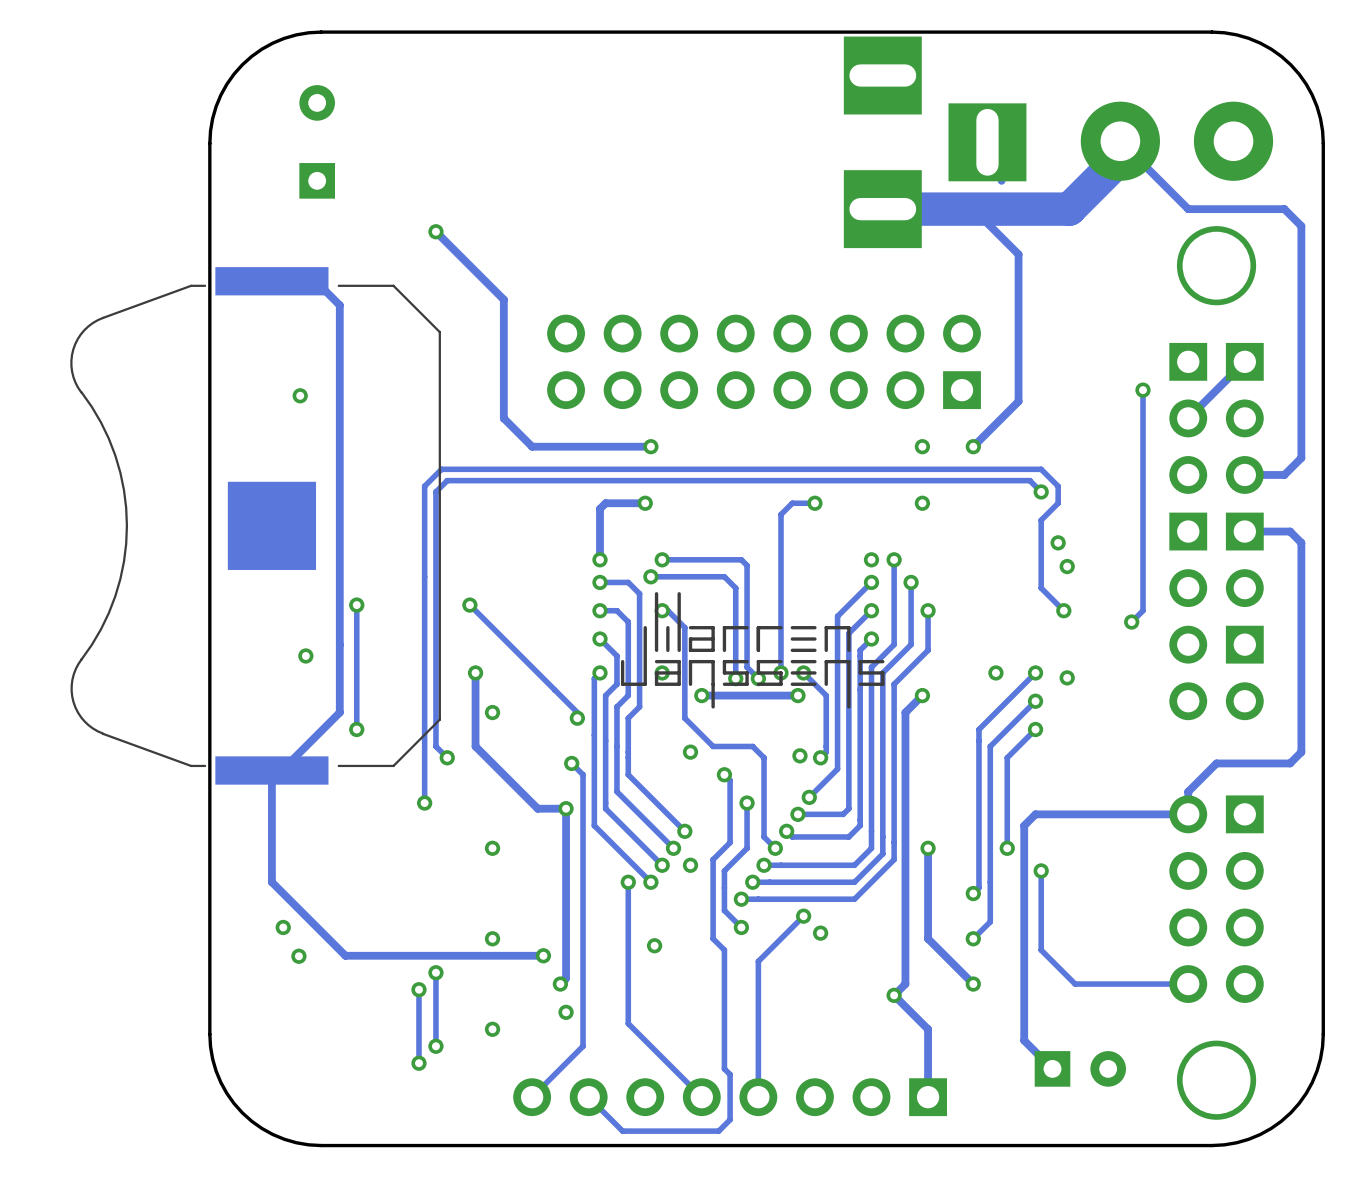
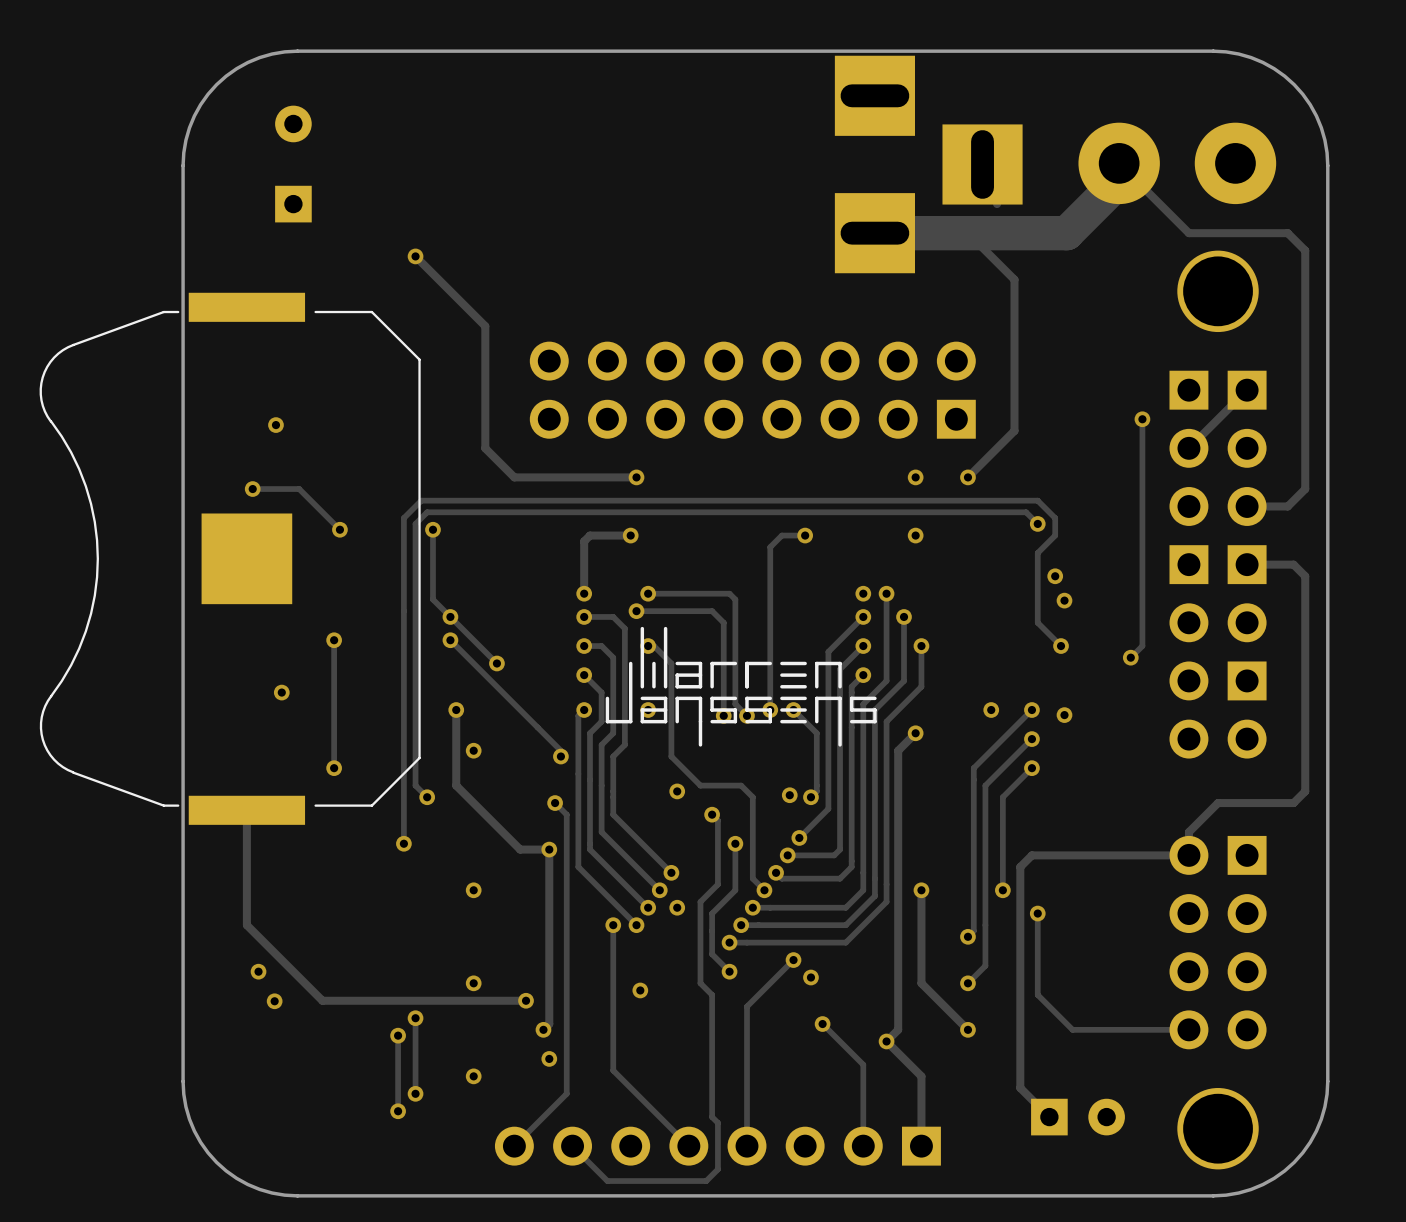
track: (315, 281) (339, 305) (339, 712) (281, 770) -> none
track: none -> (252, 489) (299, 489) (339, 529)
via: none -> (252, 489)
via: none -> (339, 529)
track: none -> (432, 529) (432, 599) (496, 663)
via: none -> (432, 529)
via: none -> (450, 616)
via: none -> (496, 663)
via: (701, 695) -> none
track: (797, 695) (701, 695) -> none
via: (797, 695) -> none
track: none -> (822, 1024) (863, 1064) (863, 1146)
via: none -> (822, 1024)

